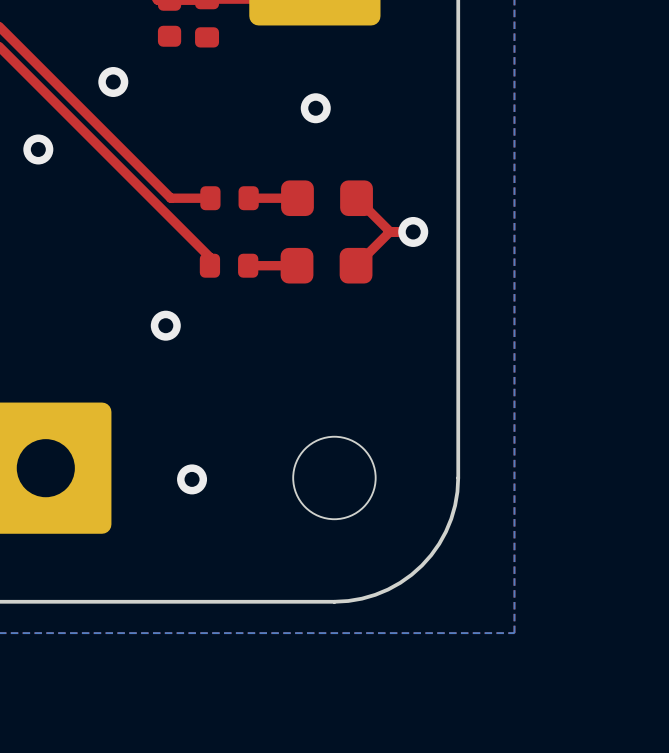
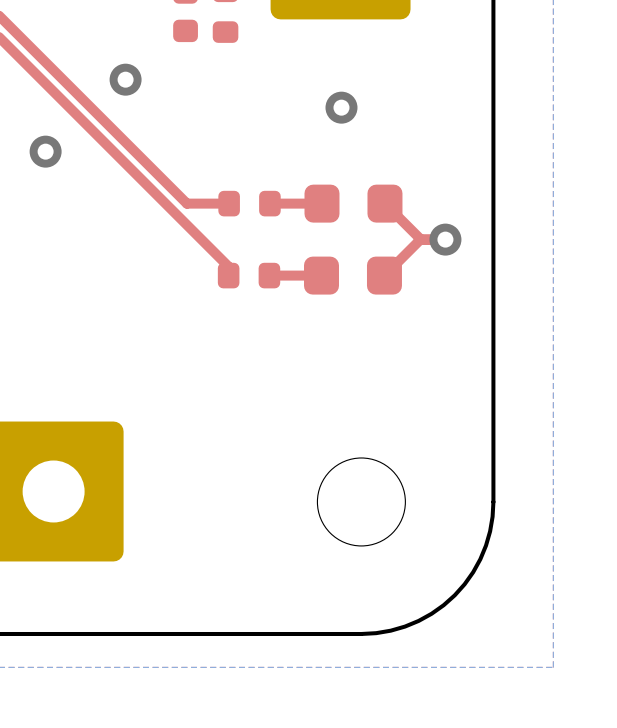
via: (165, 325) -> none
via: (192, 479) -> none

